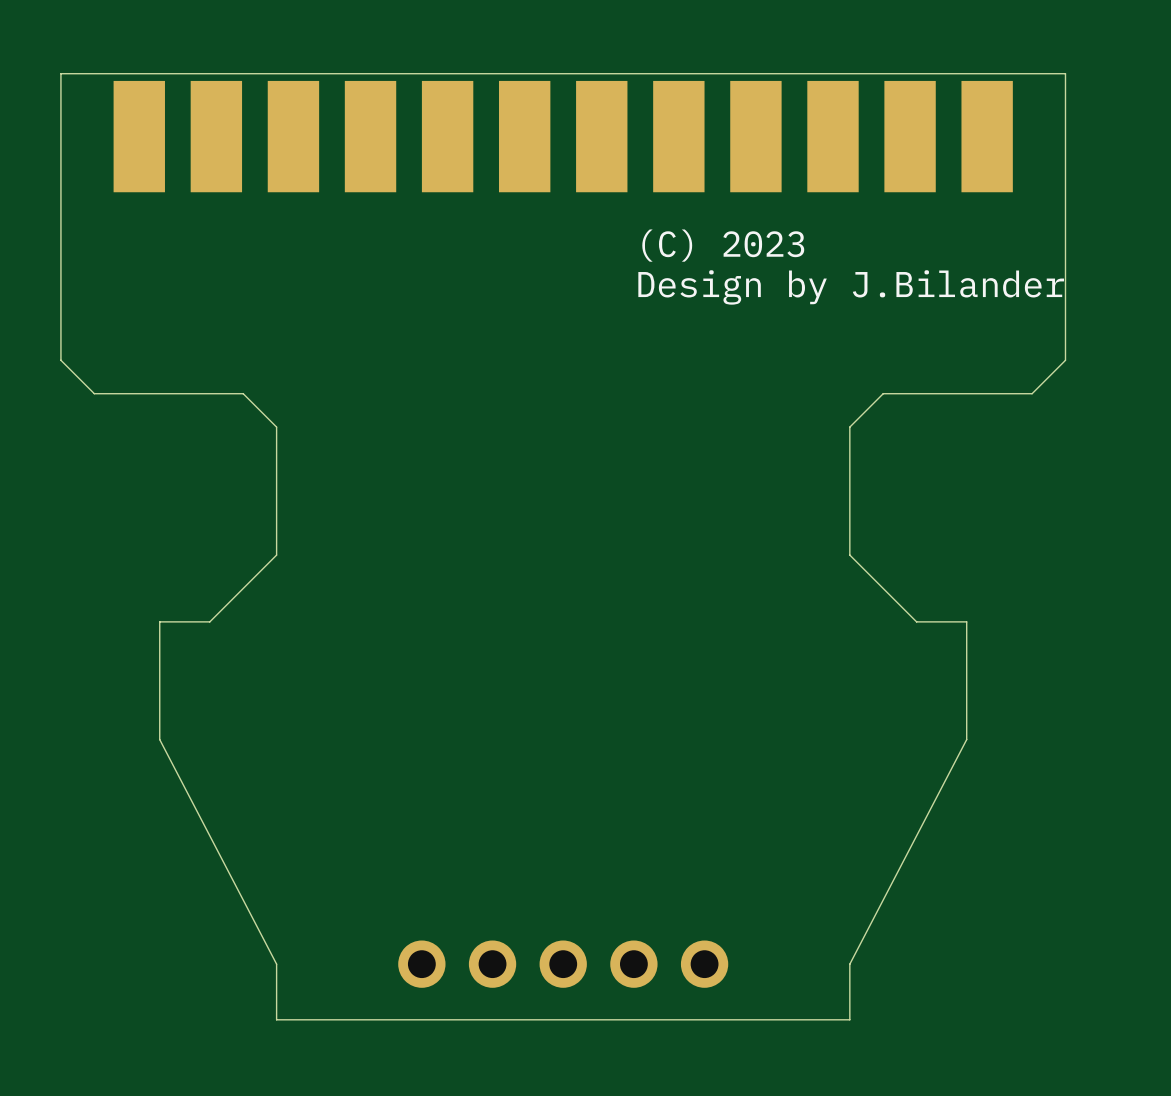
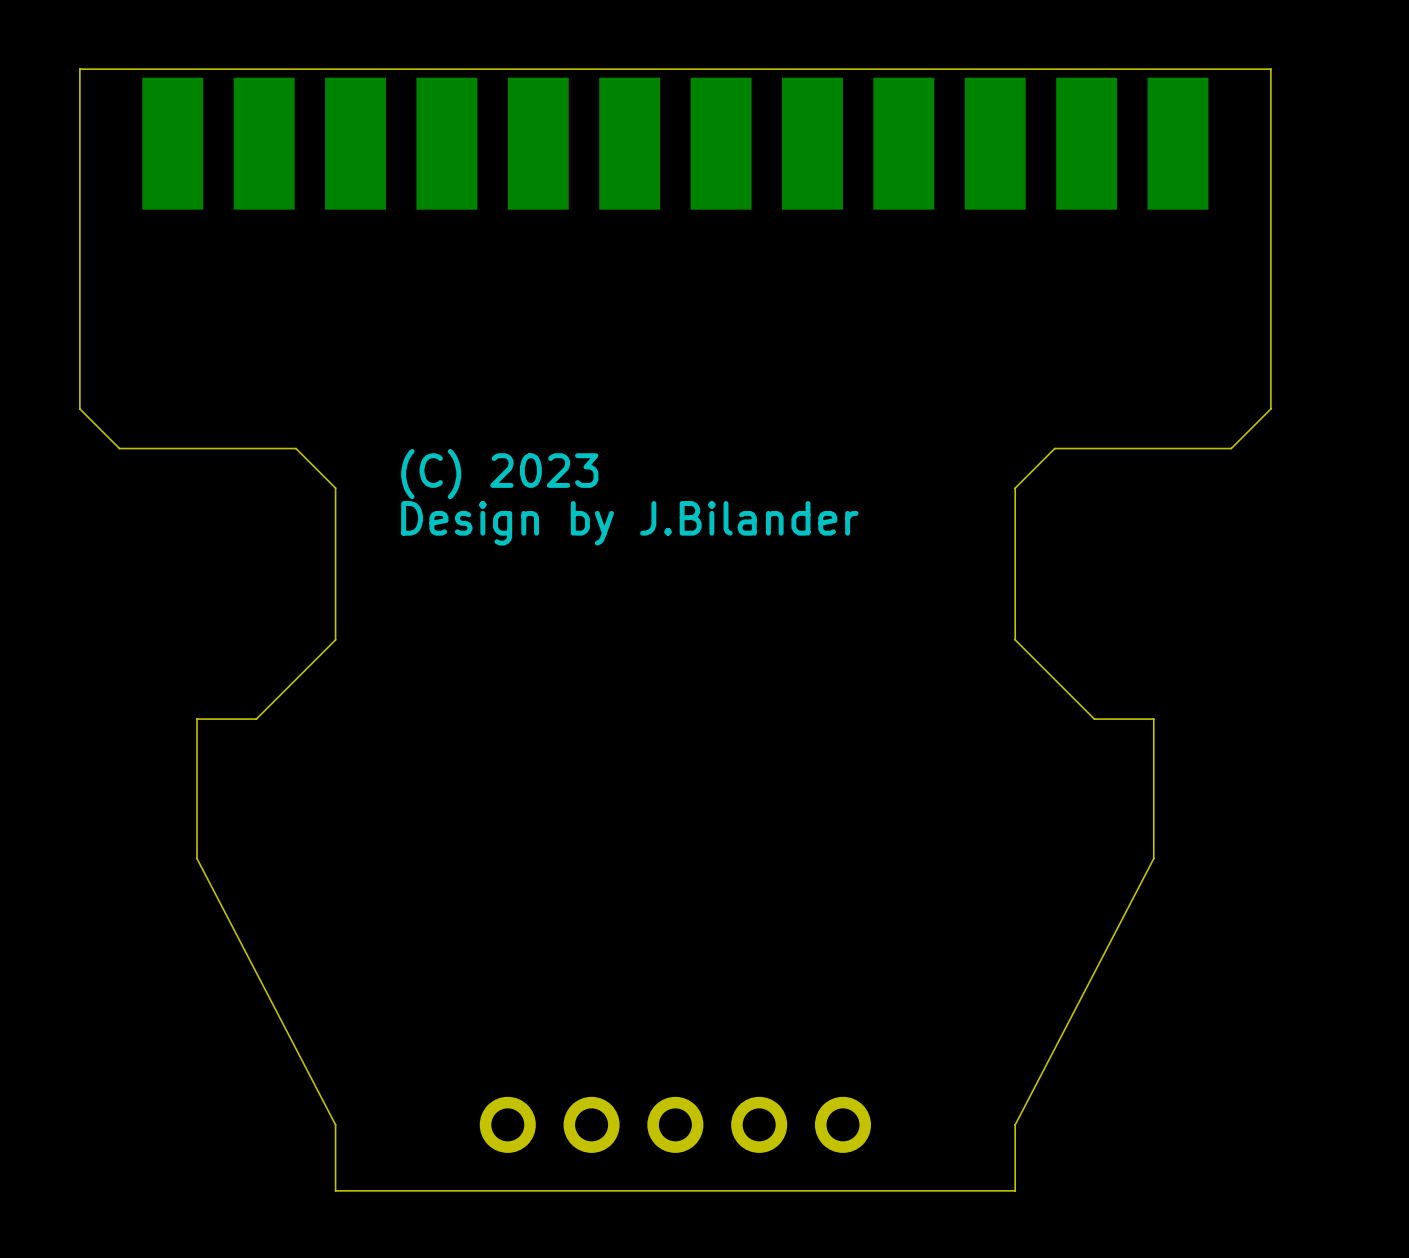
text position: (C) 2023 (723, 245) -> (C) 2023 (499, 474)
text position: Design by J.Bilander (851, 287) -> Design by J.Bilander (629, 523)

